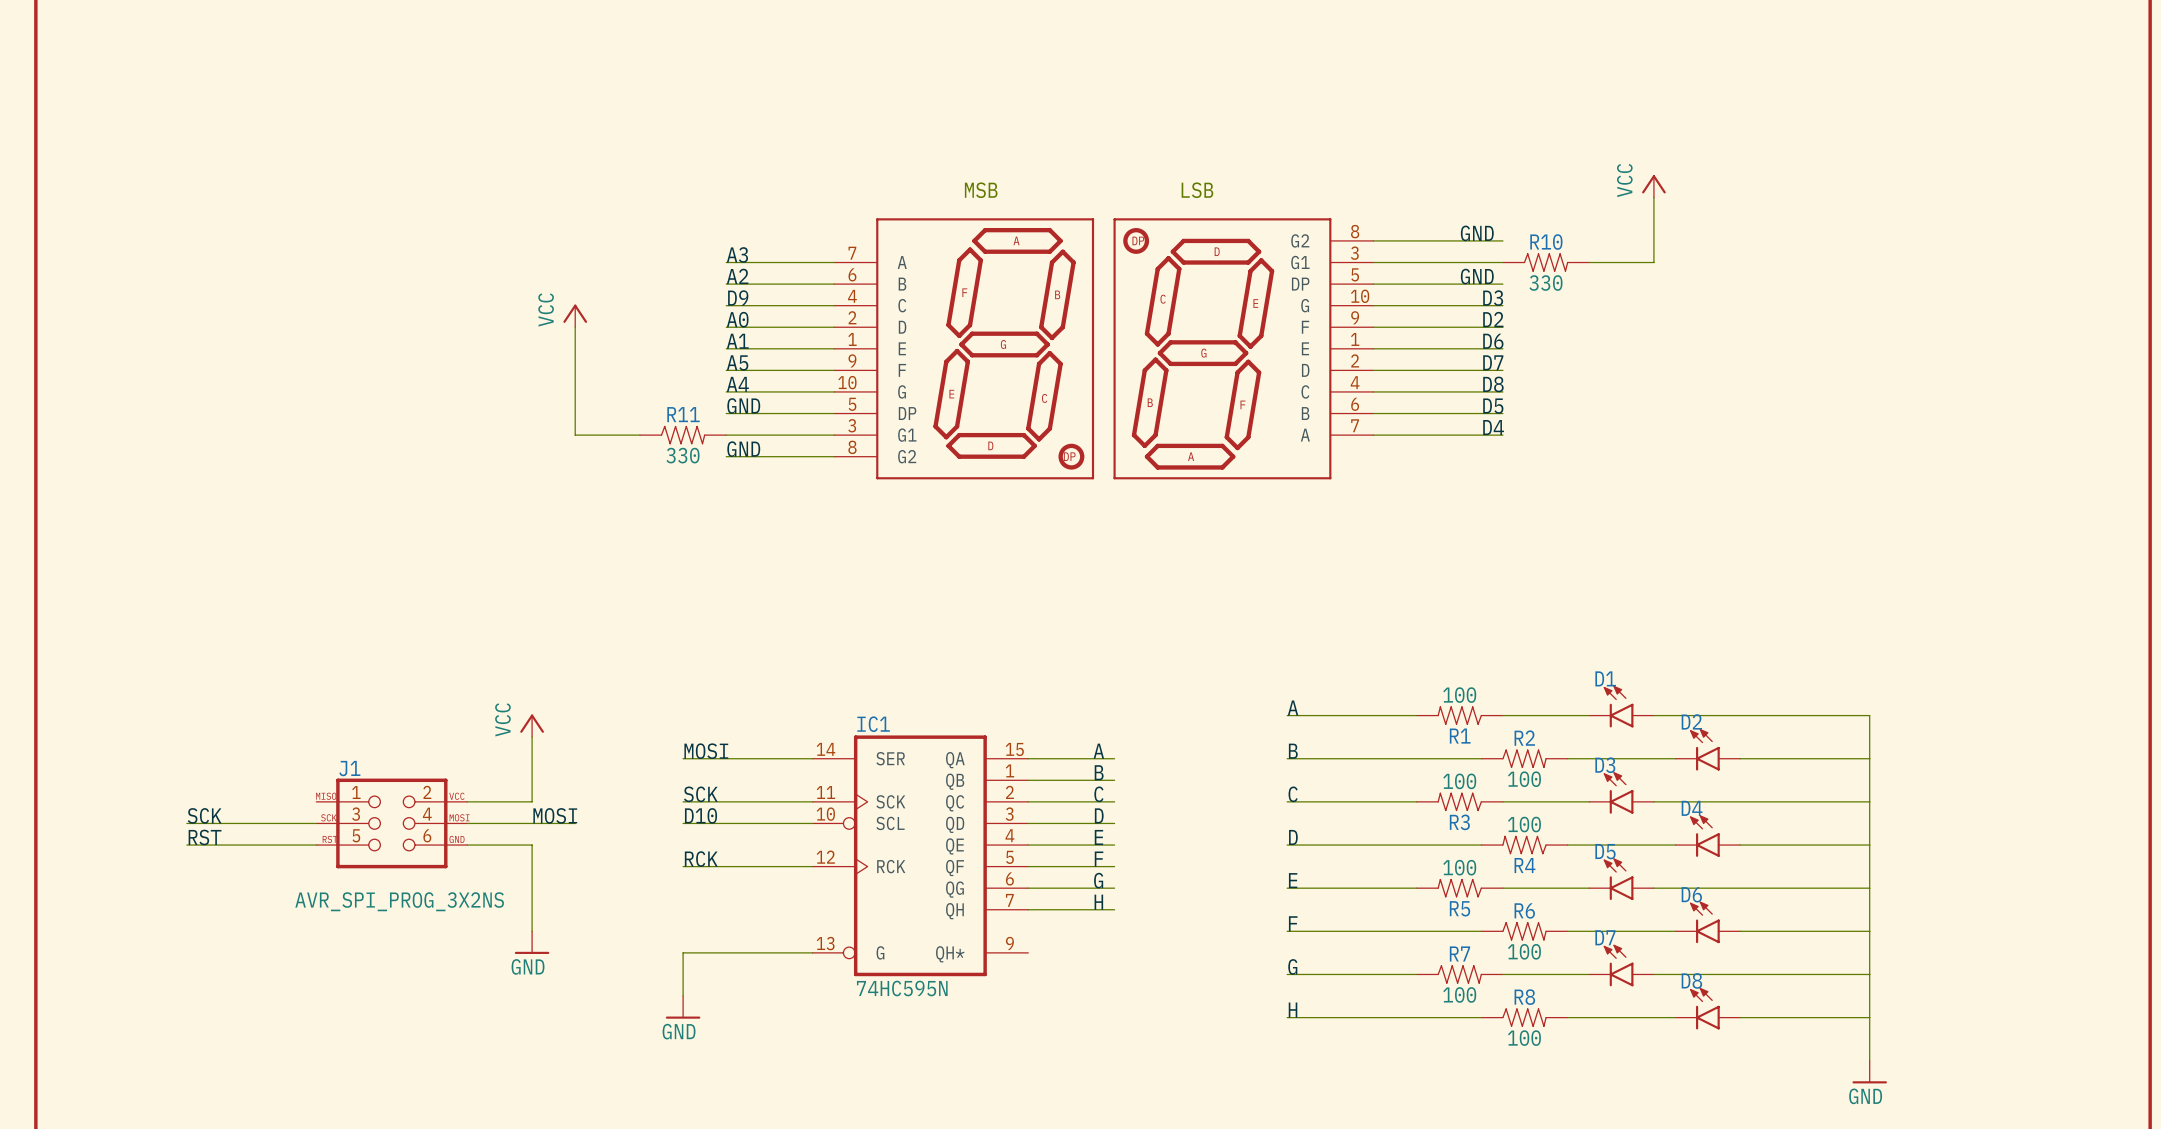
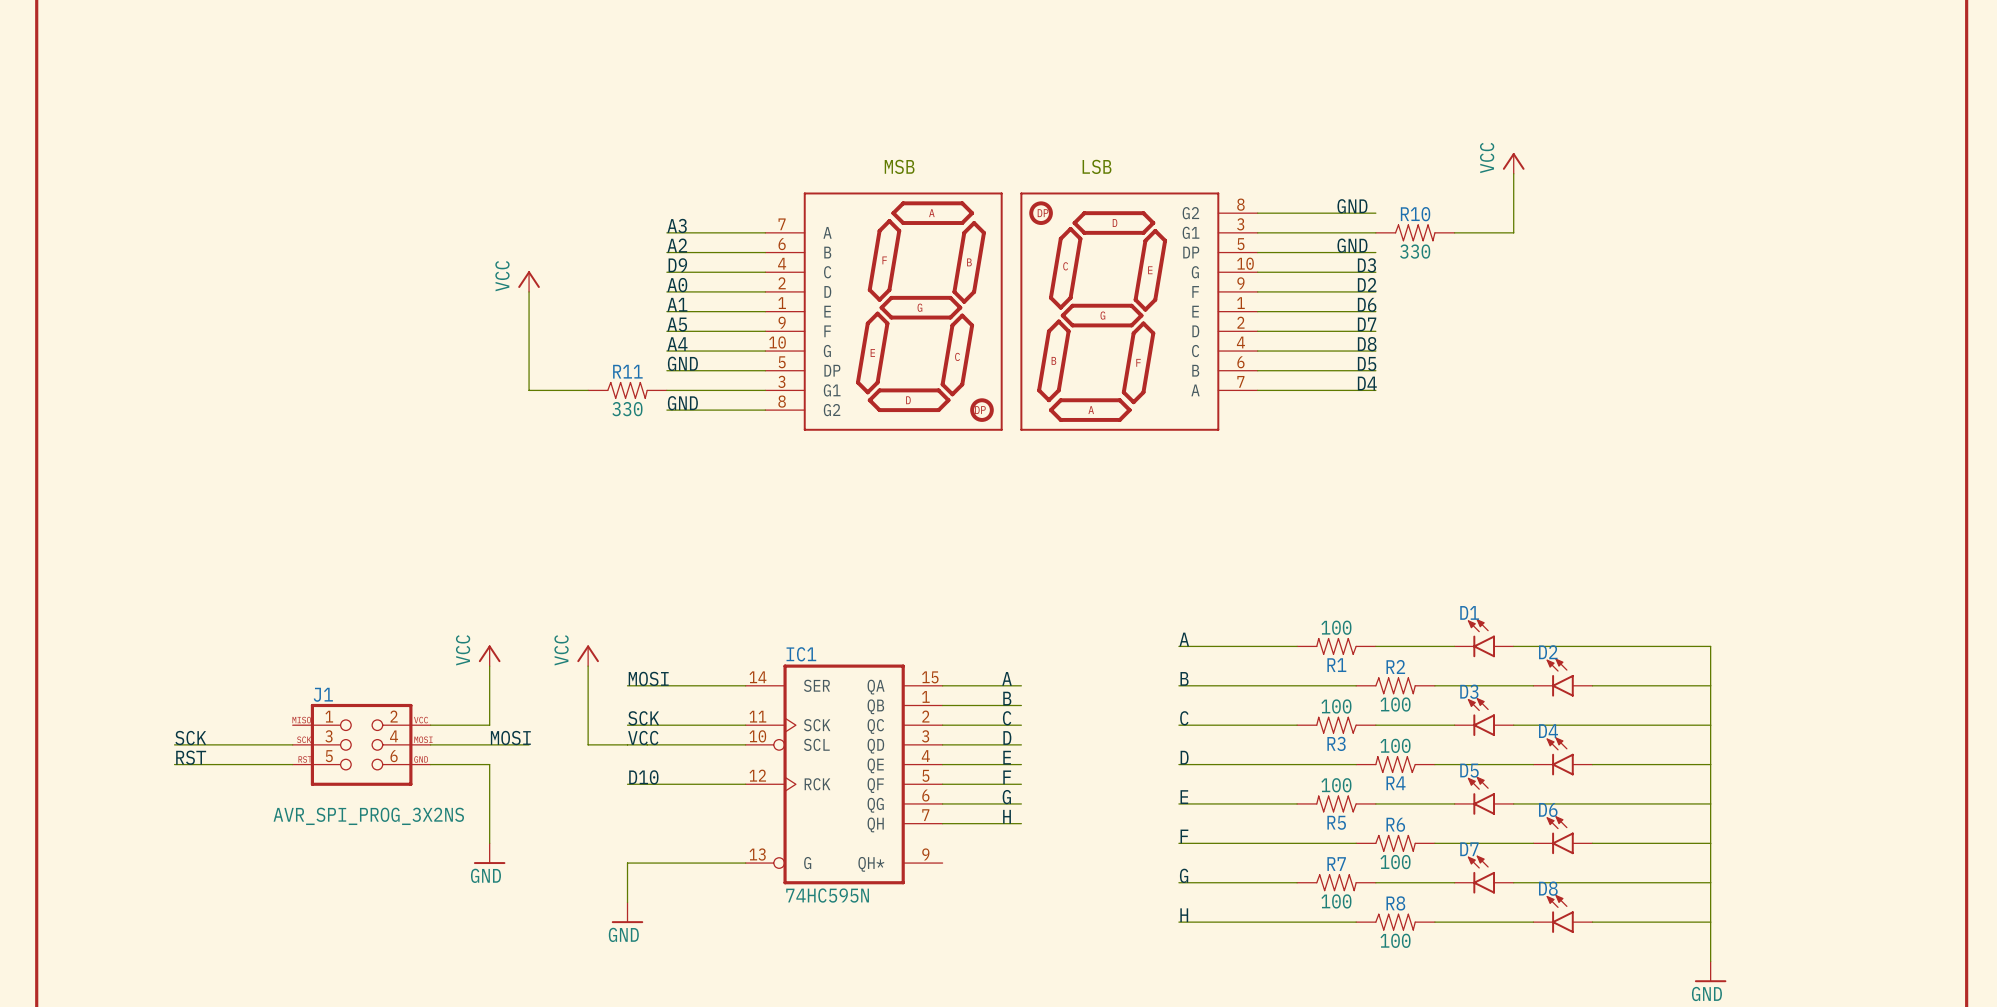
power symbol: none -> VCC (588, 655)
wire: none -> (588, 666) (588, 744) (627, 744)
label: D10 (701, 815) -> VCC (643, 737)
label: RCK (701, 859) -> D10 (643, 777)

